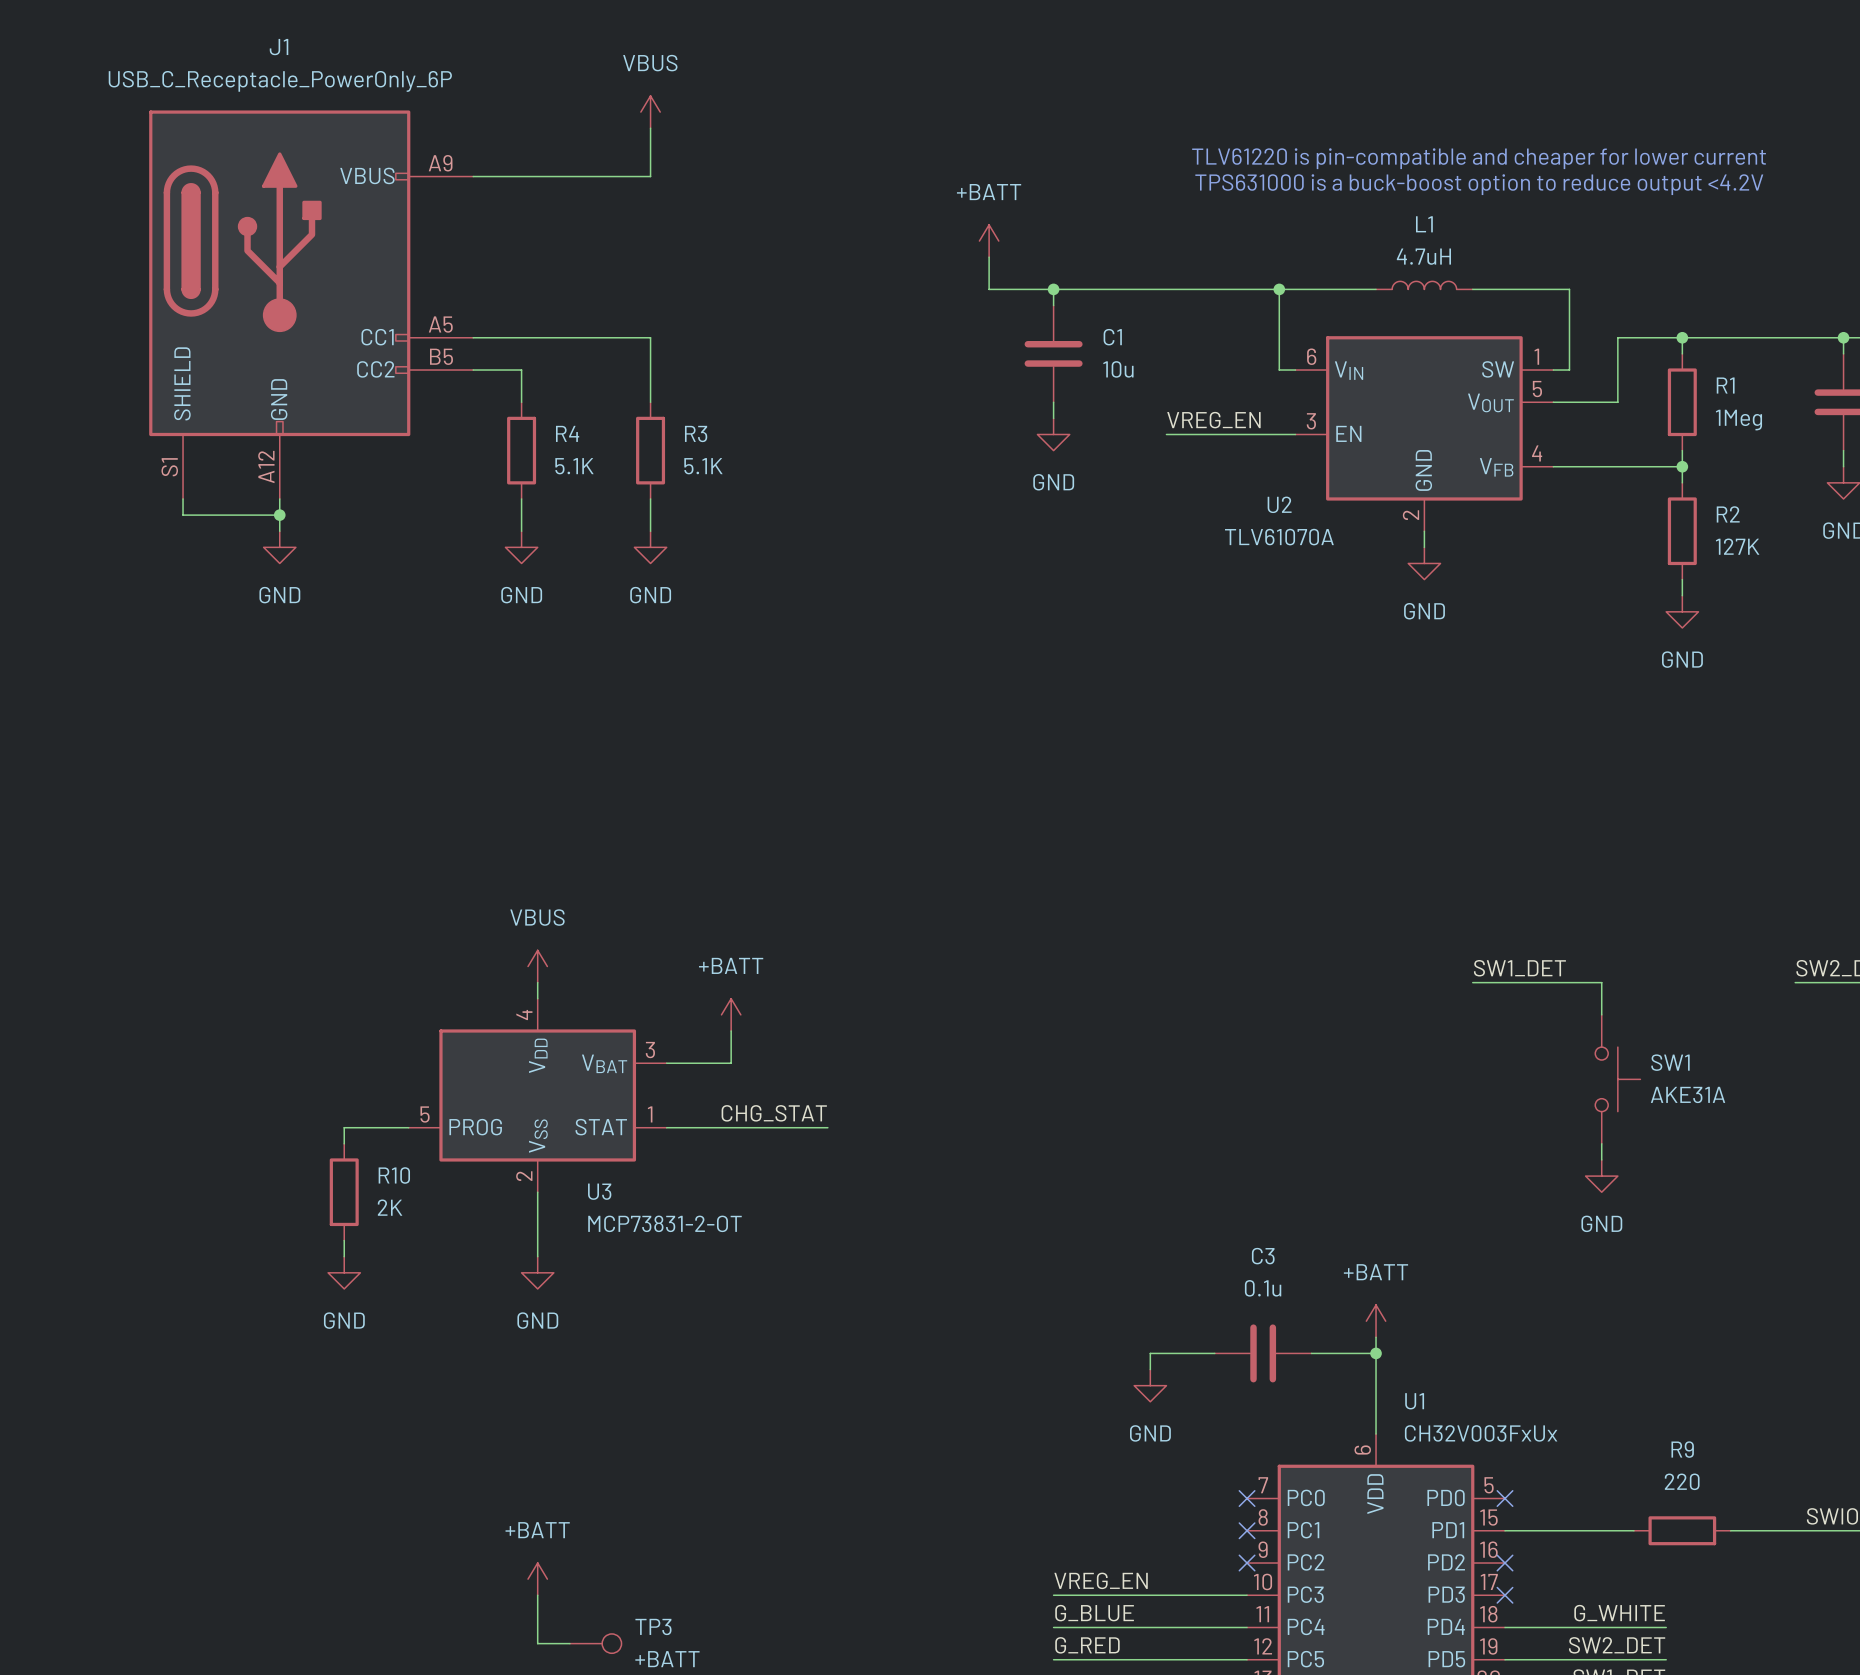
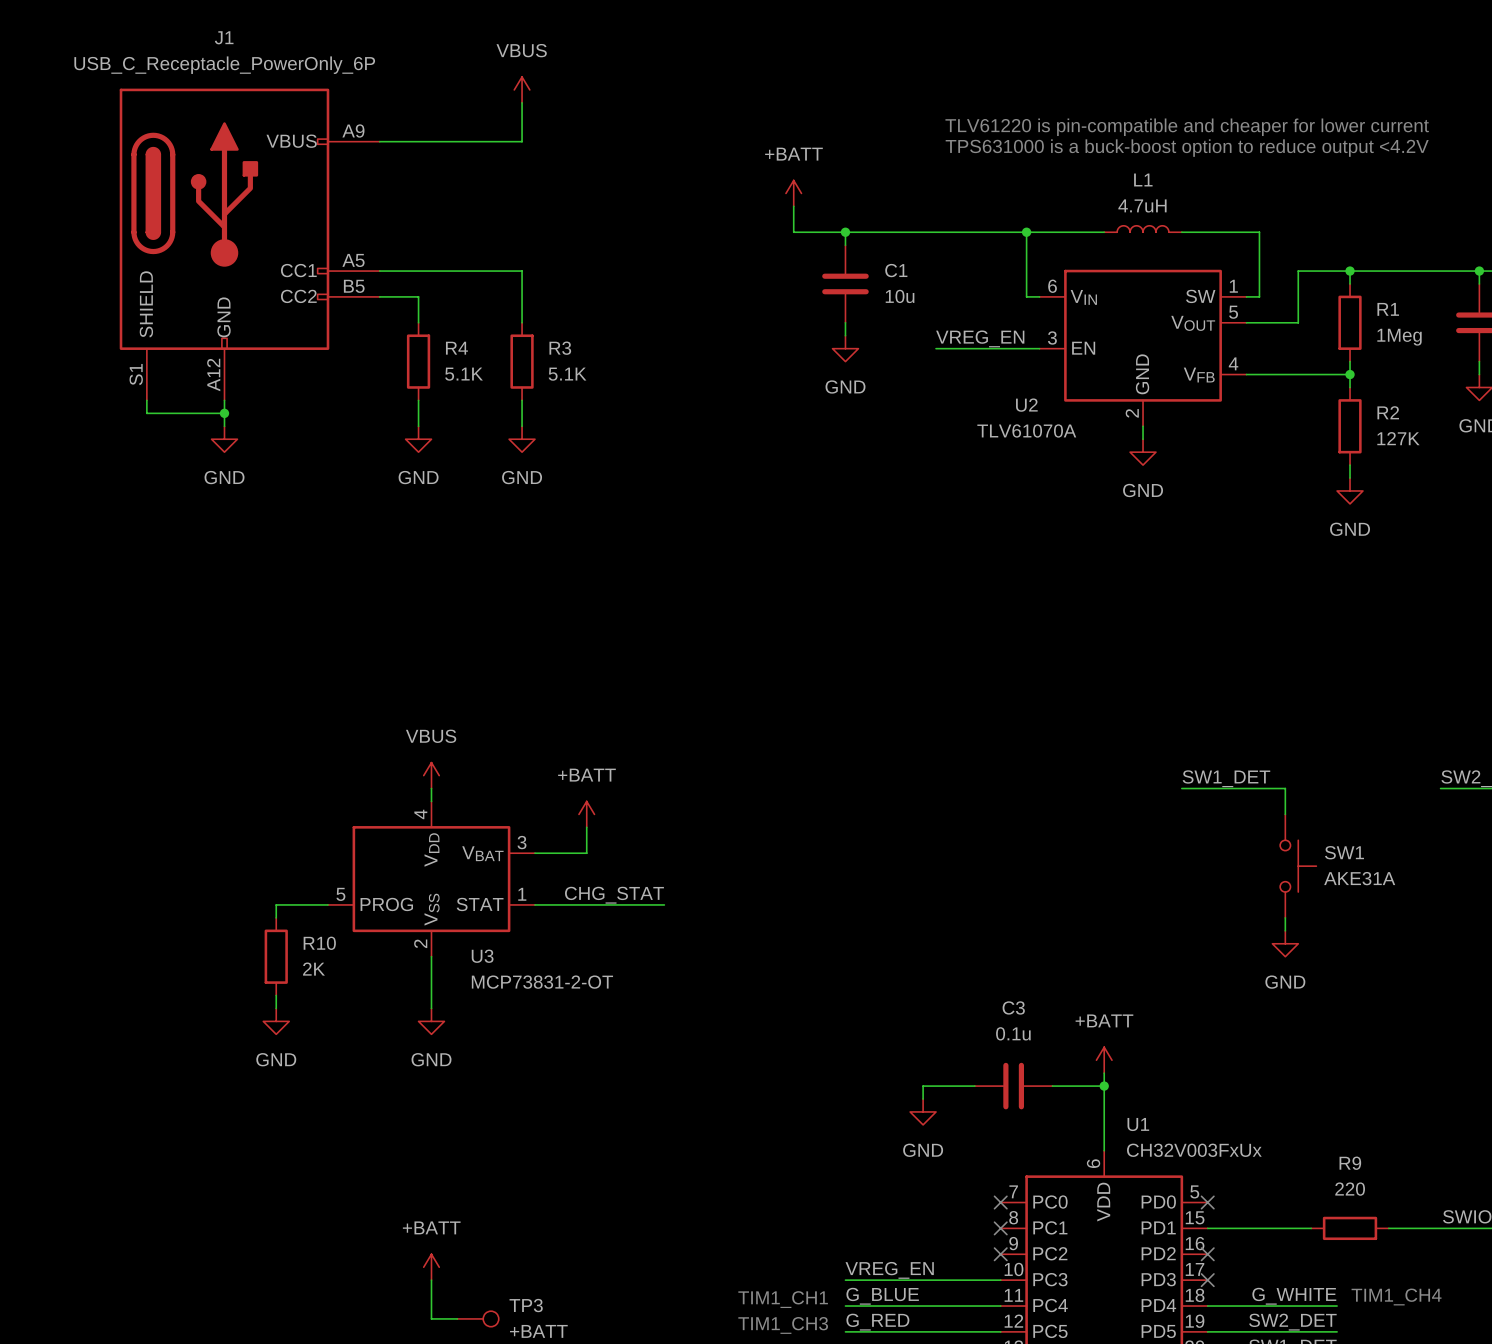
text: none -> TIM1_CH4 (1396, 1296)
text: none -> TIM1_CH1 (783, 1299)
text: none -> TIM1_CH3 (783, 1325)

